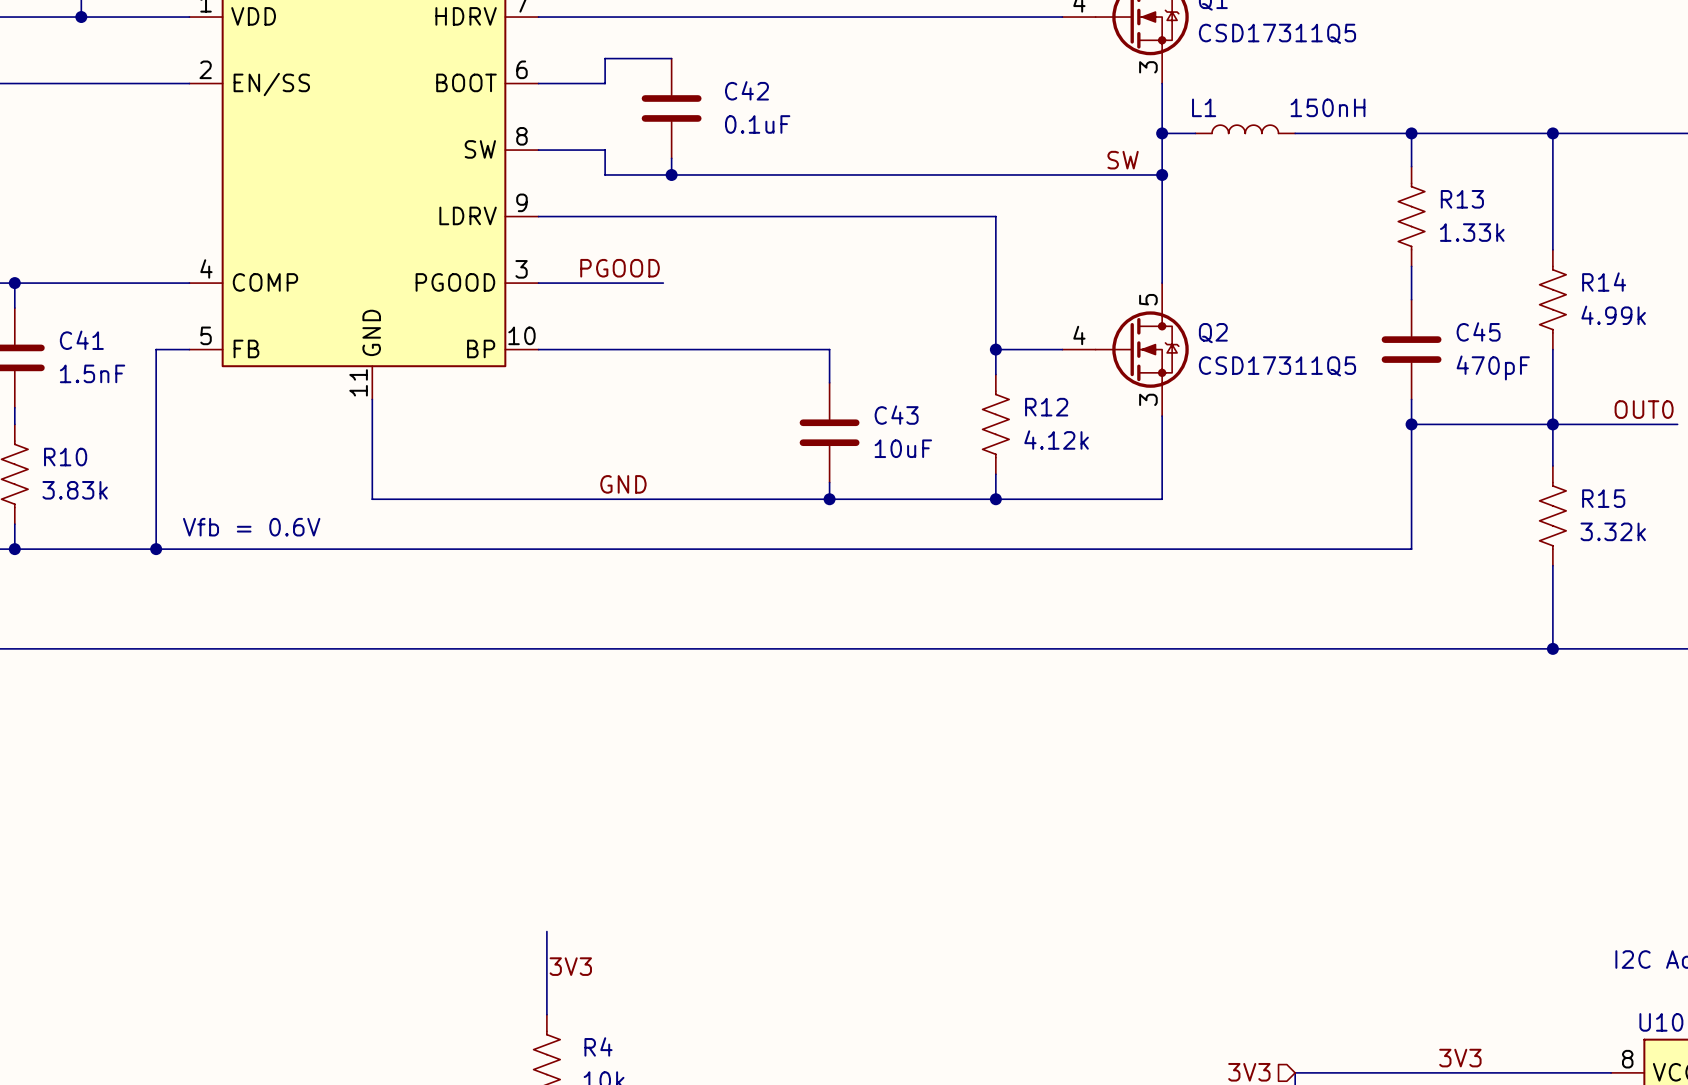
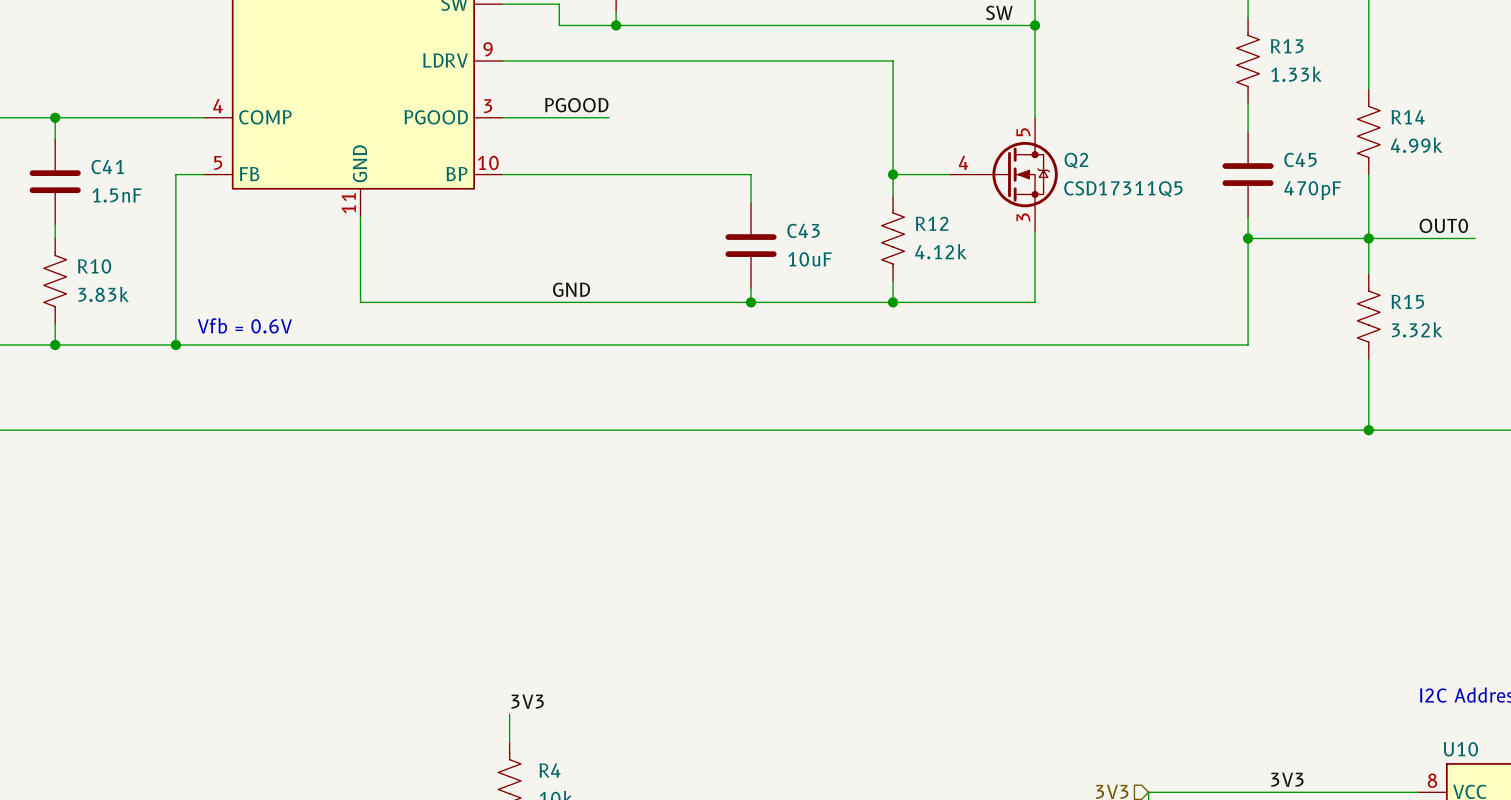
wire: (546, 931) (546, 981) -> none

